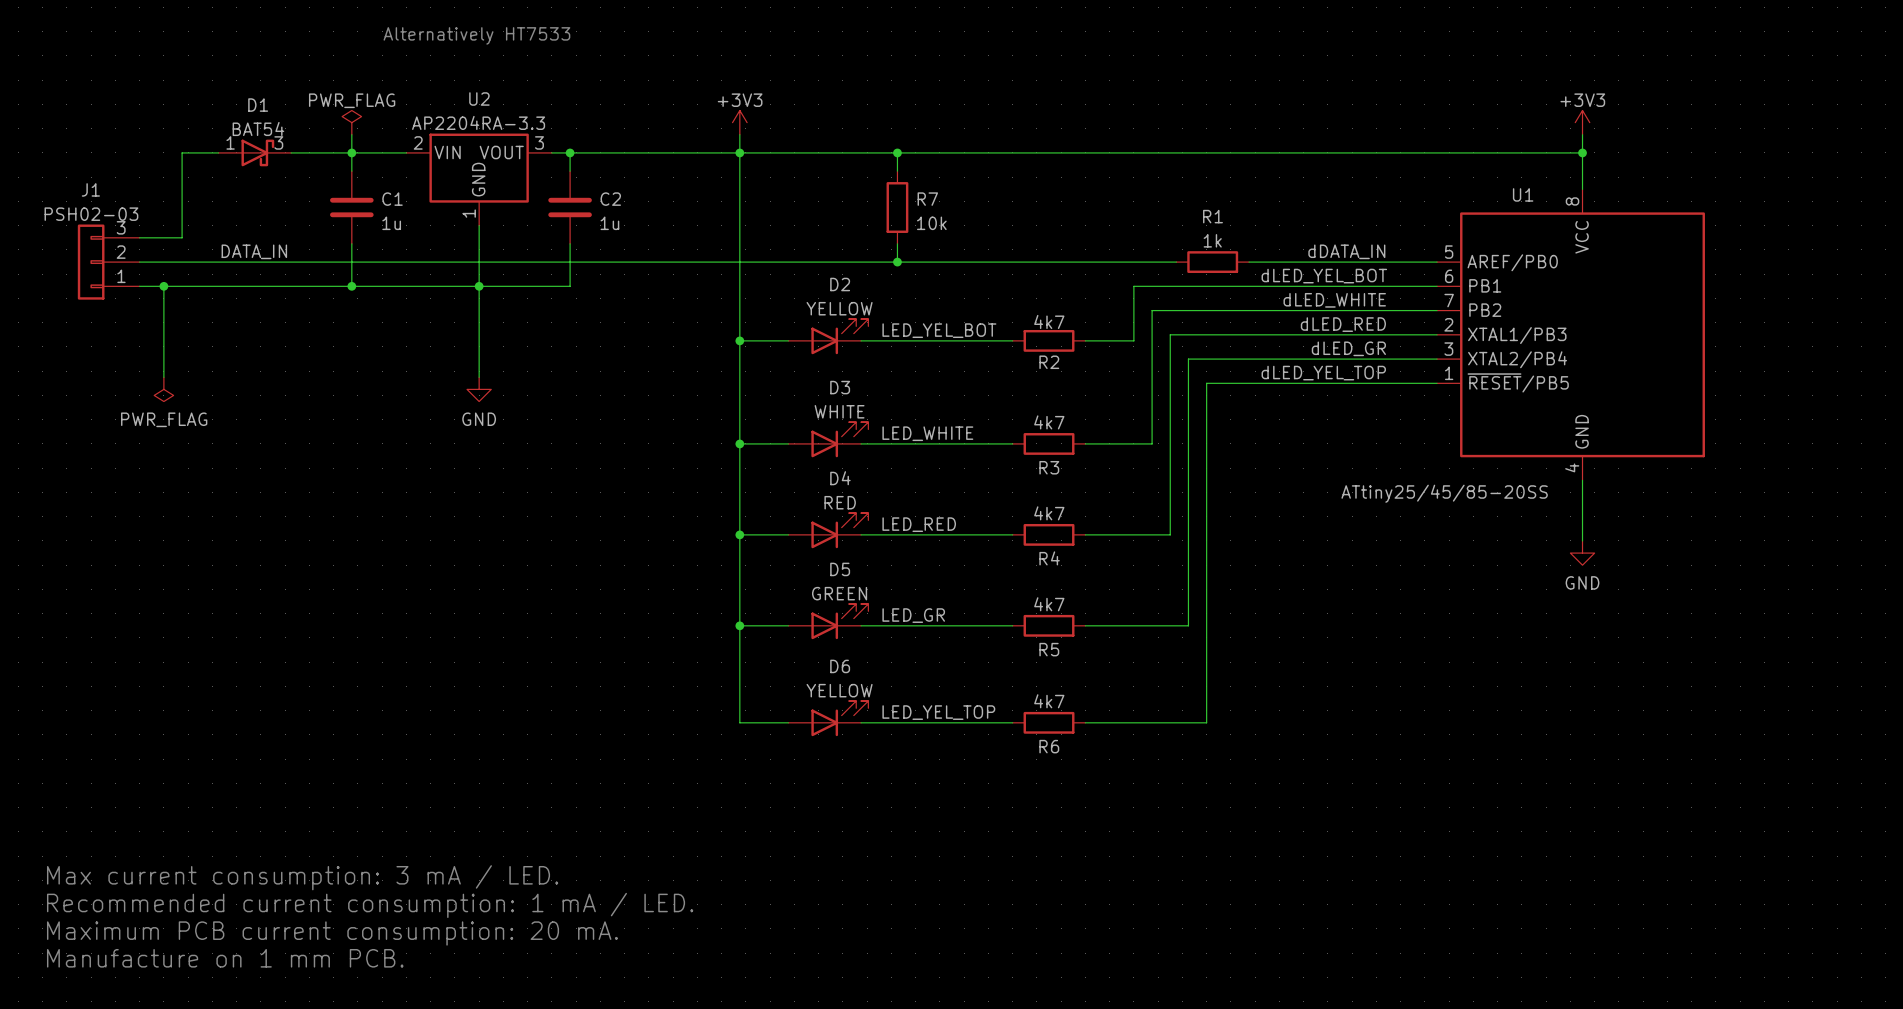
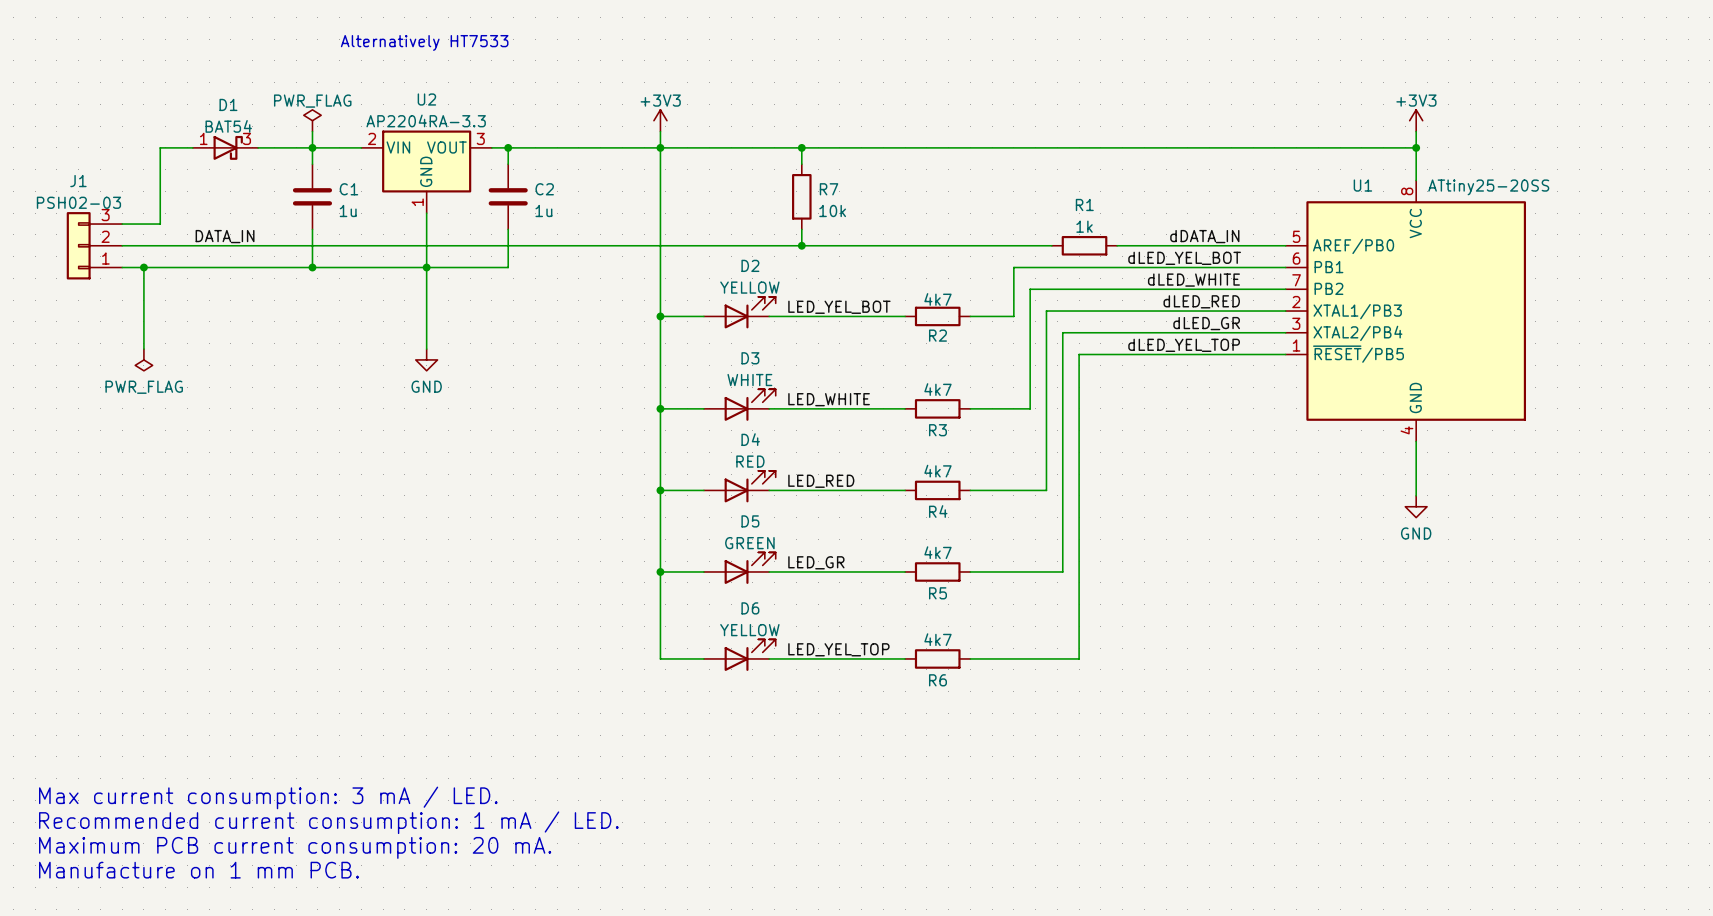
U1 value: ATtiny25/45/85-20SS (1444, 493) -> ATtiny25-20SS (1488, 187)

